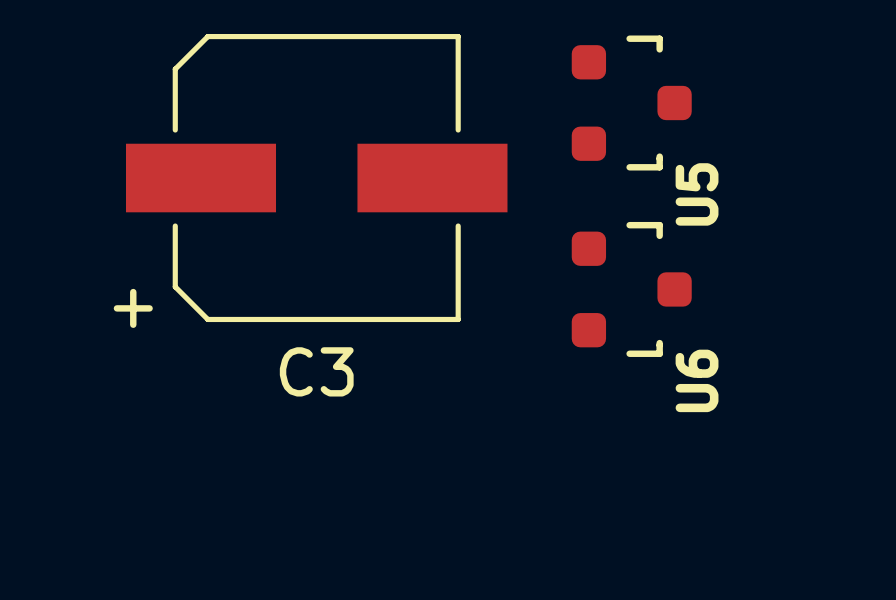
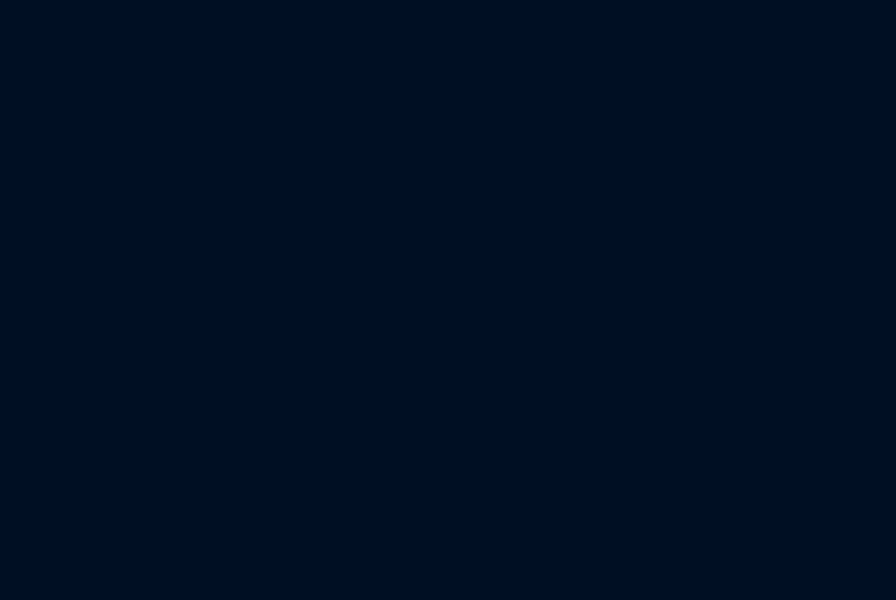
U5: (631, 103) -> none
C3: (316, 178) -> none
U6: (631, 289) -> none

